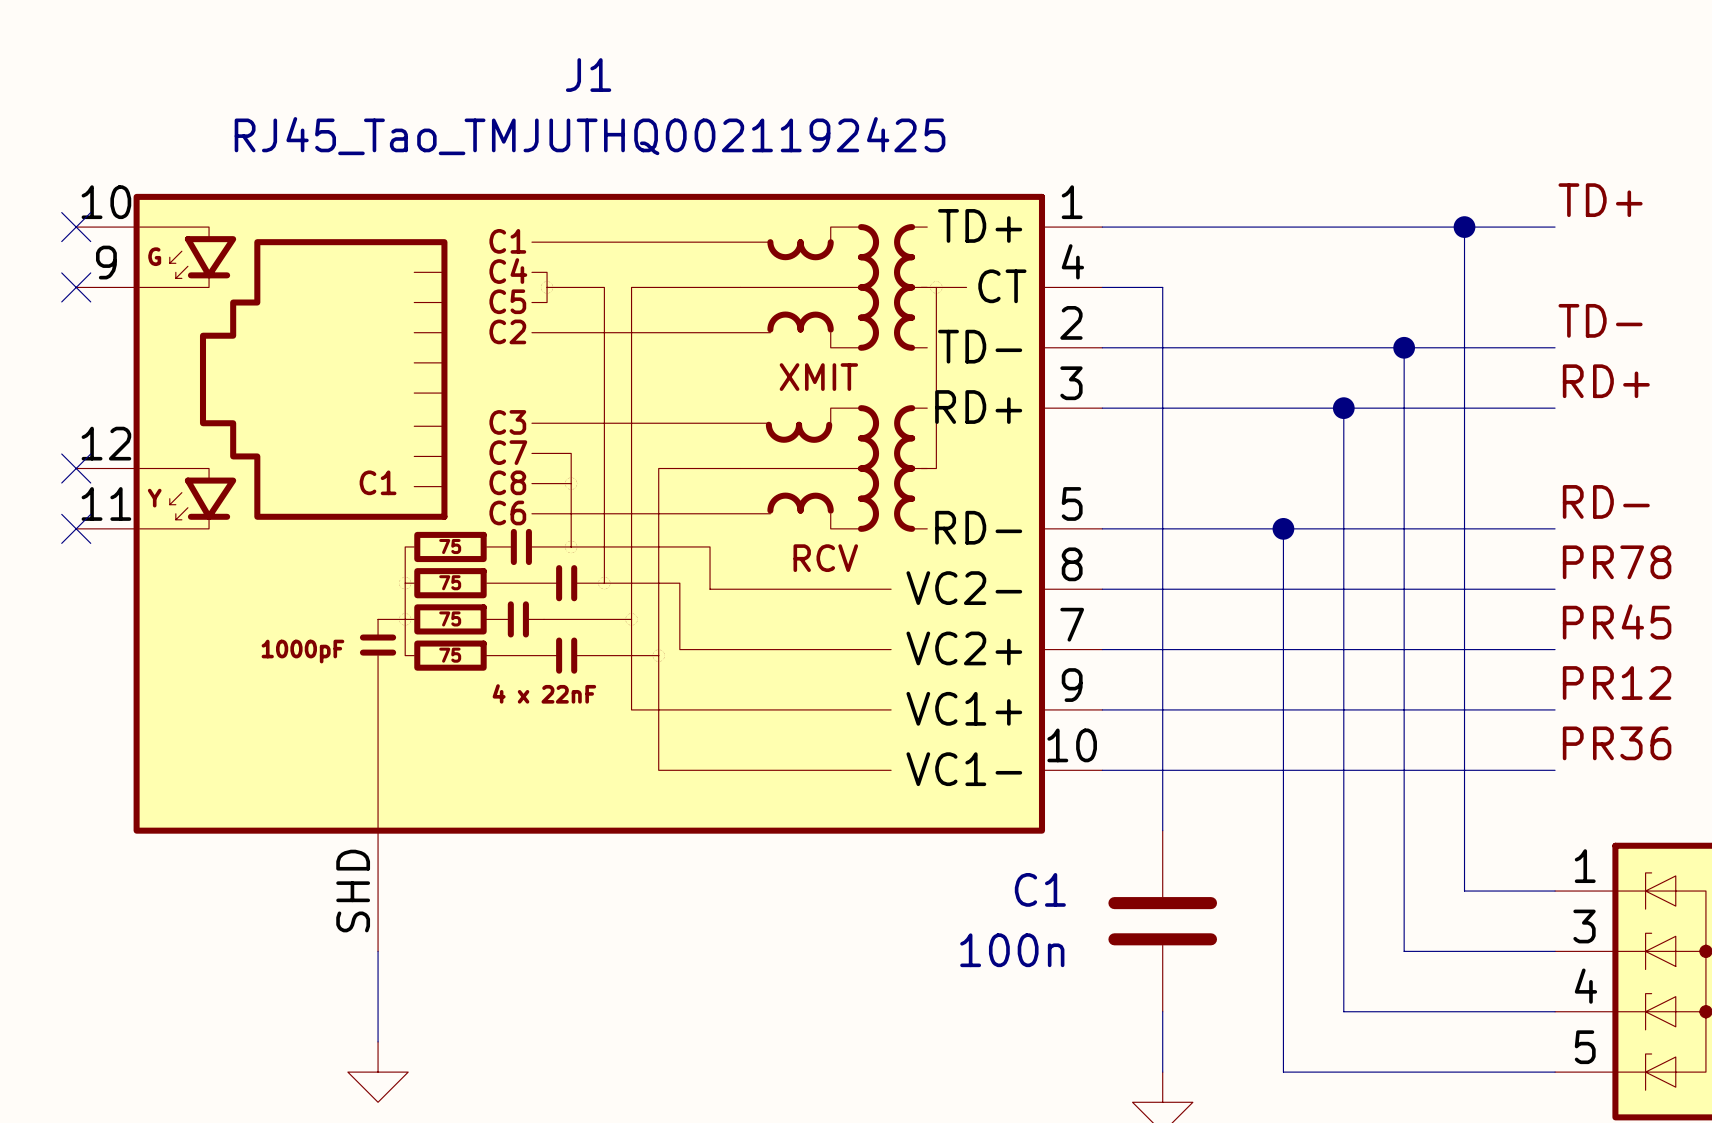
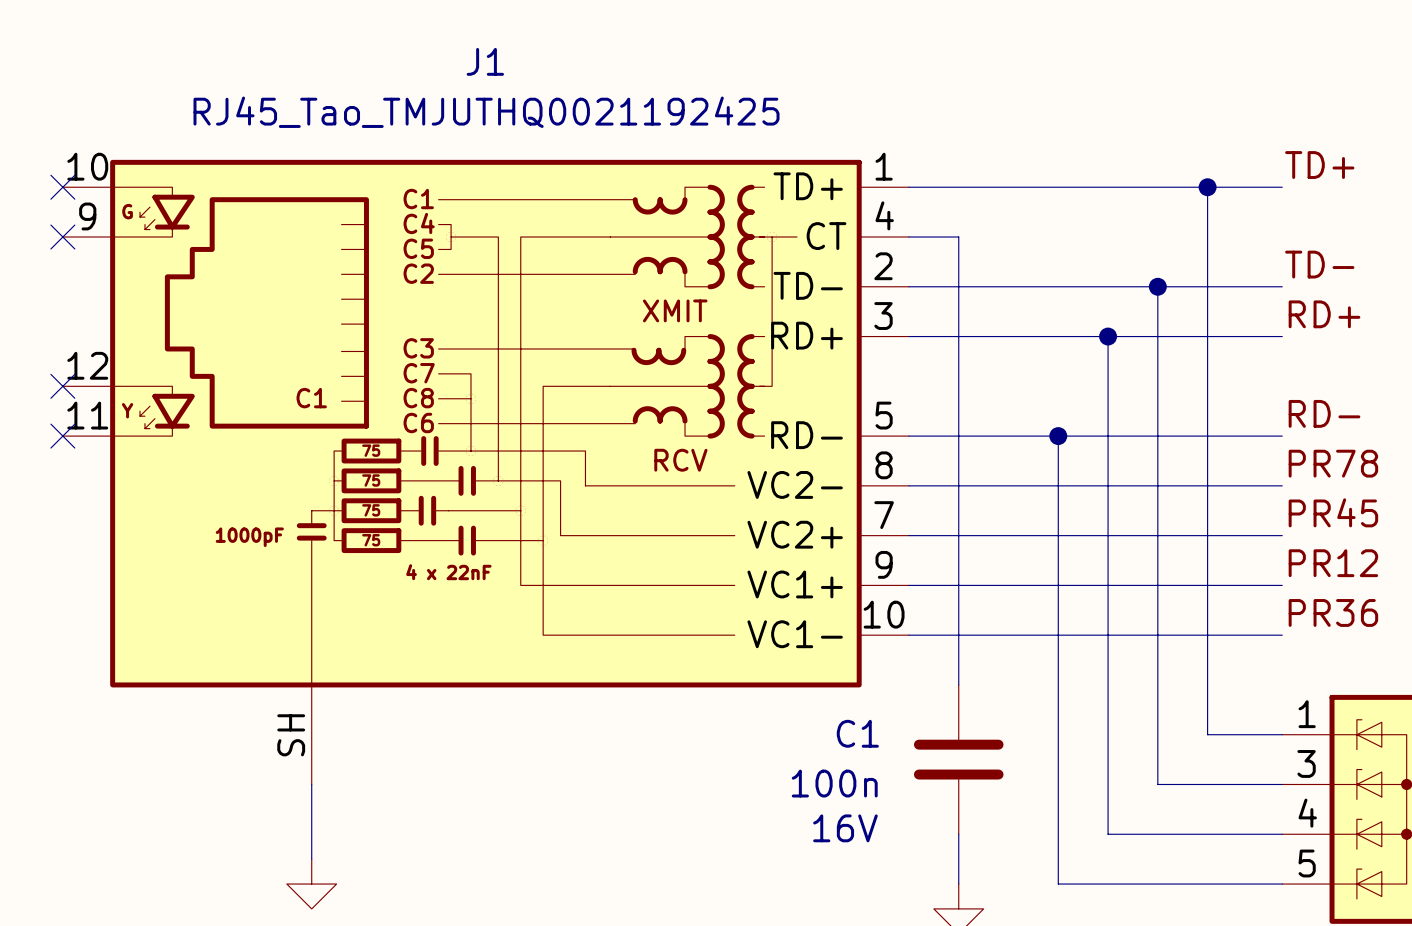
J1 pin number: SHD (353, 891) -> SH (291, 735)
C1 text: none -> 16V (845, 828)

